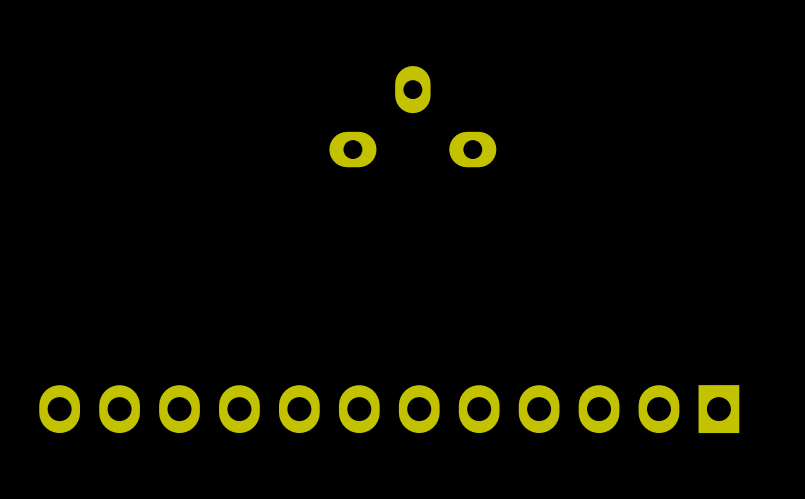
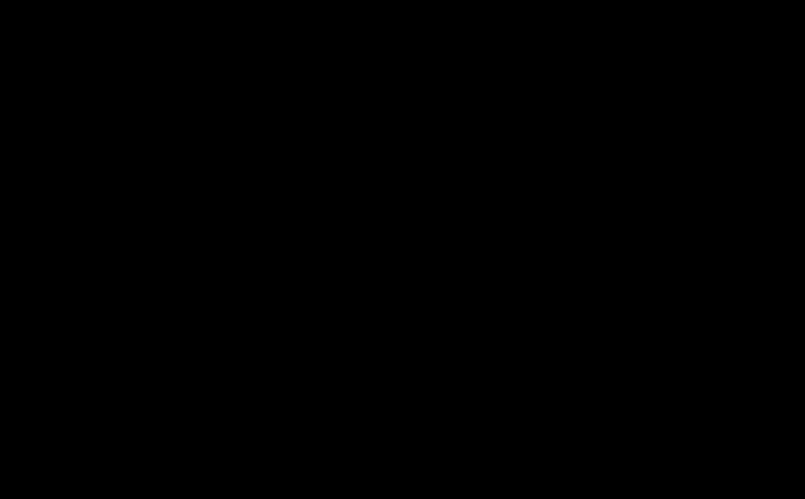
part: (412, 116) -> none
part: (389, 409) -> none

